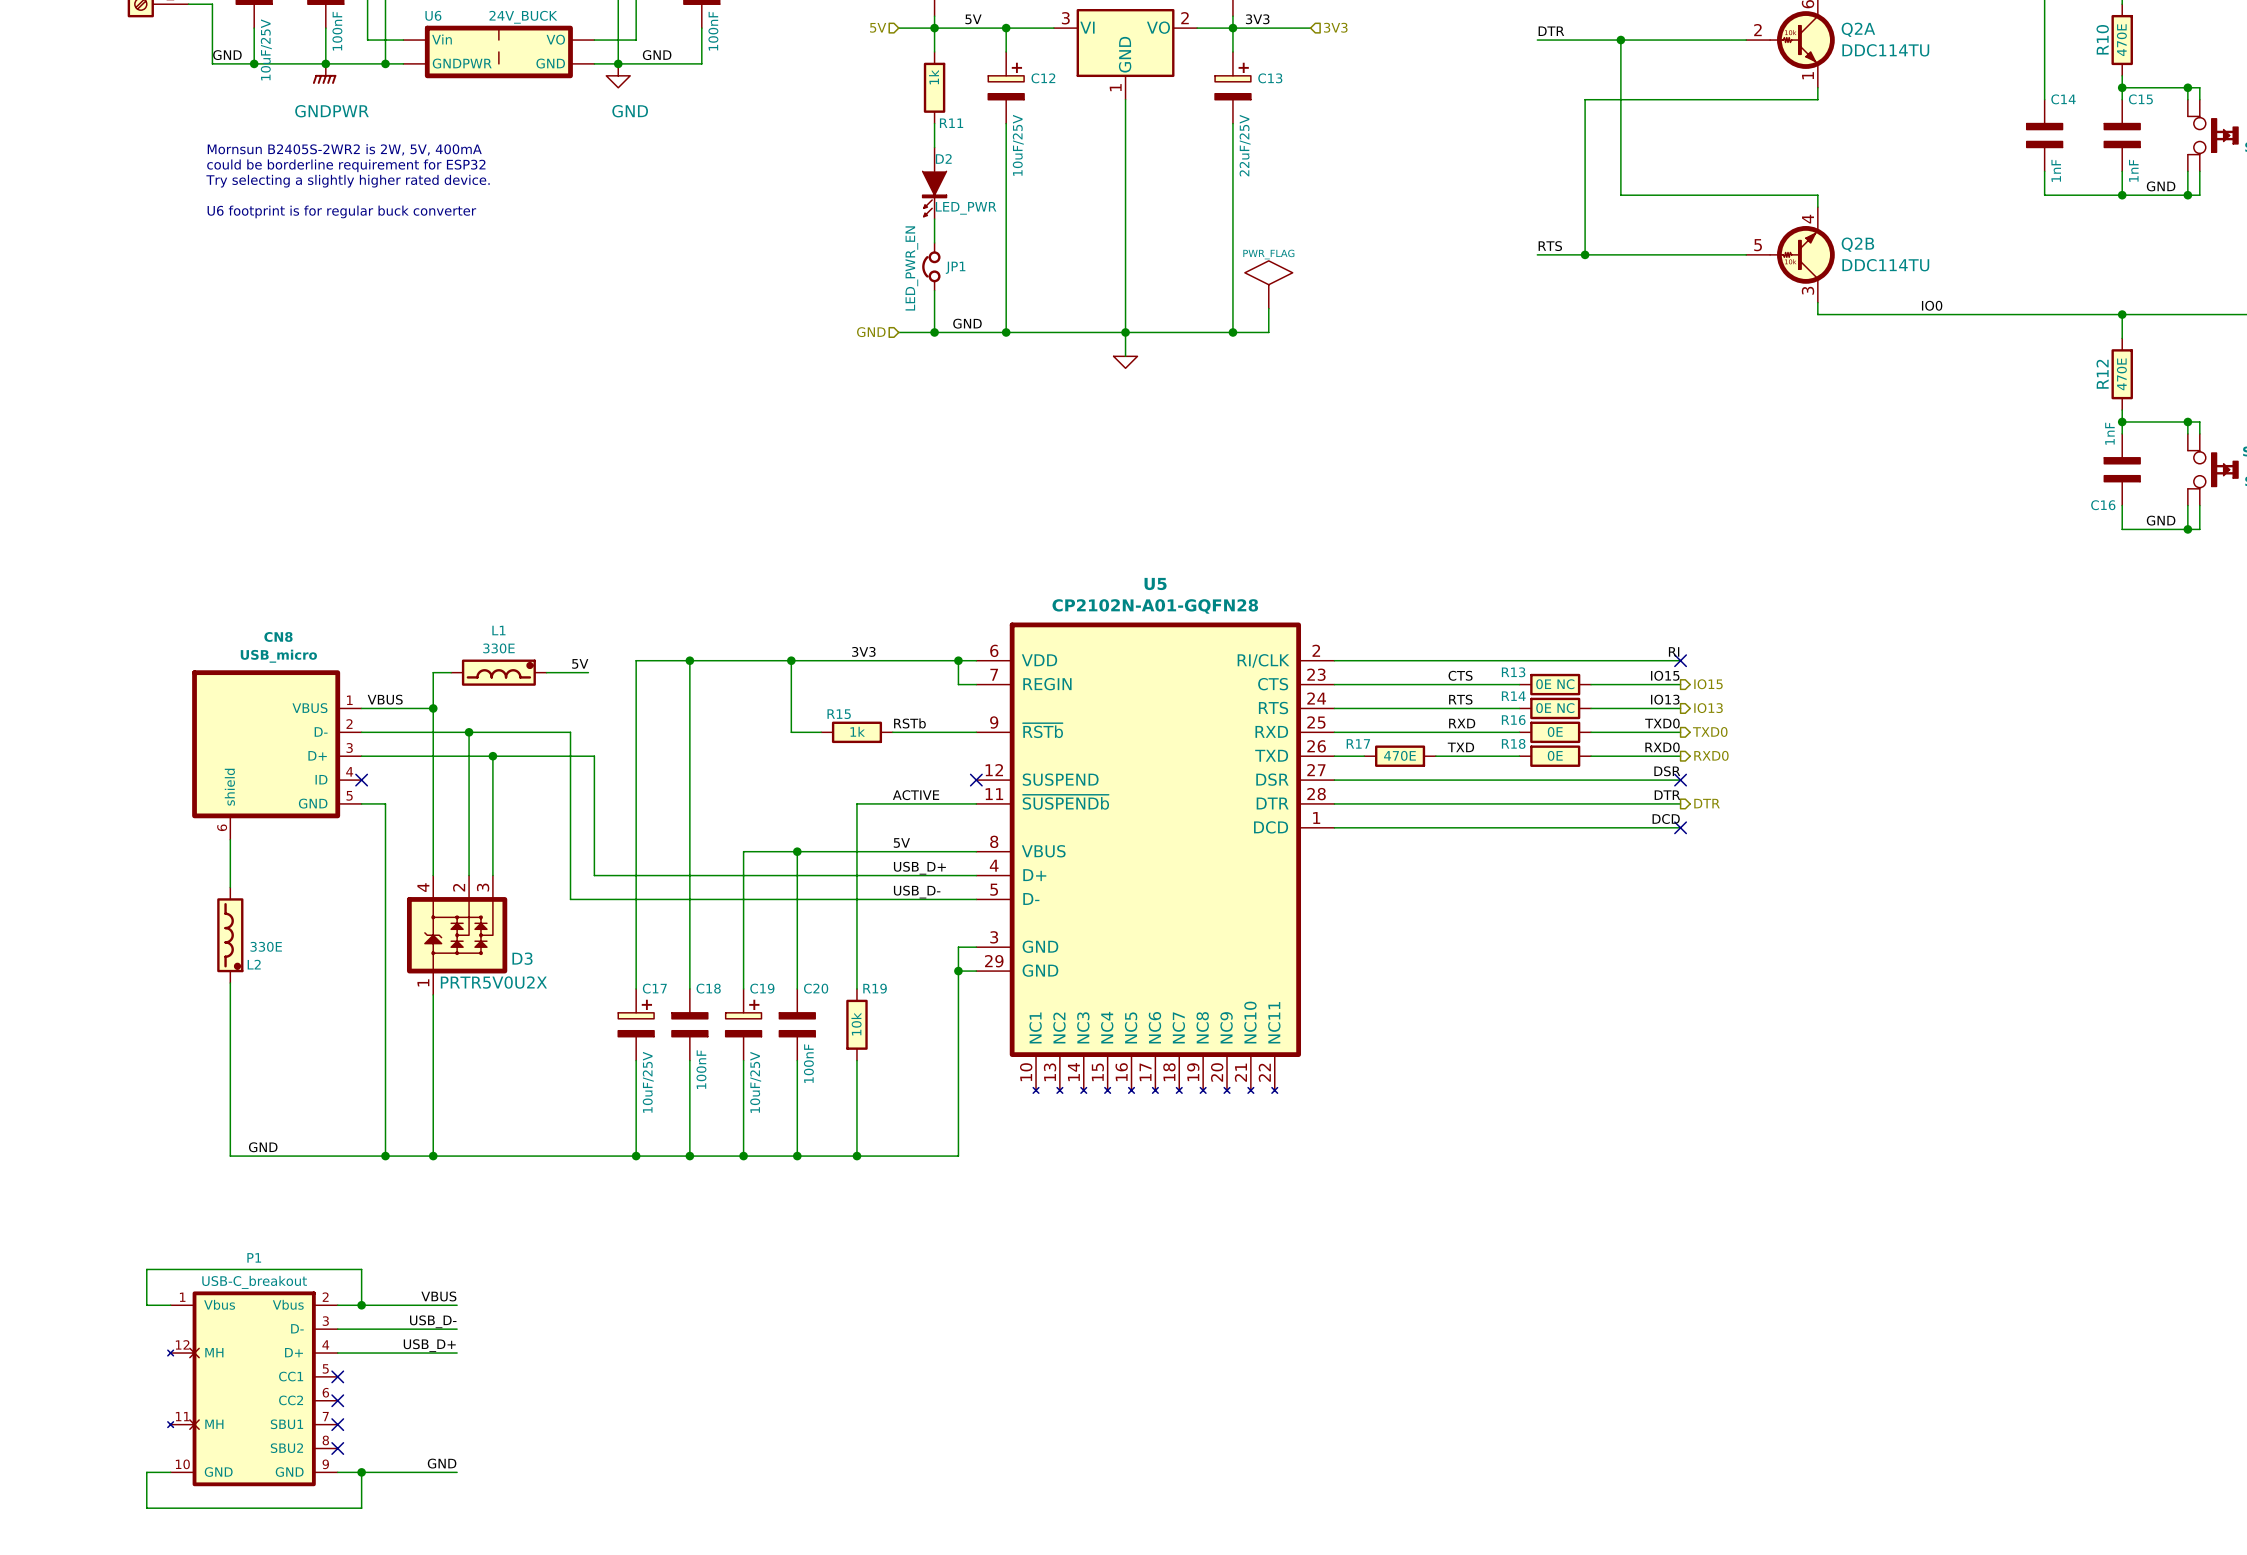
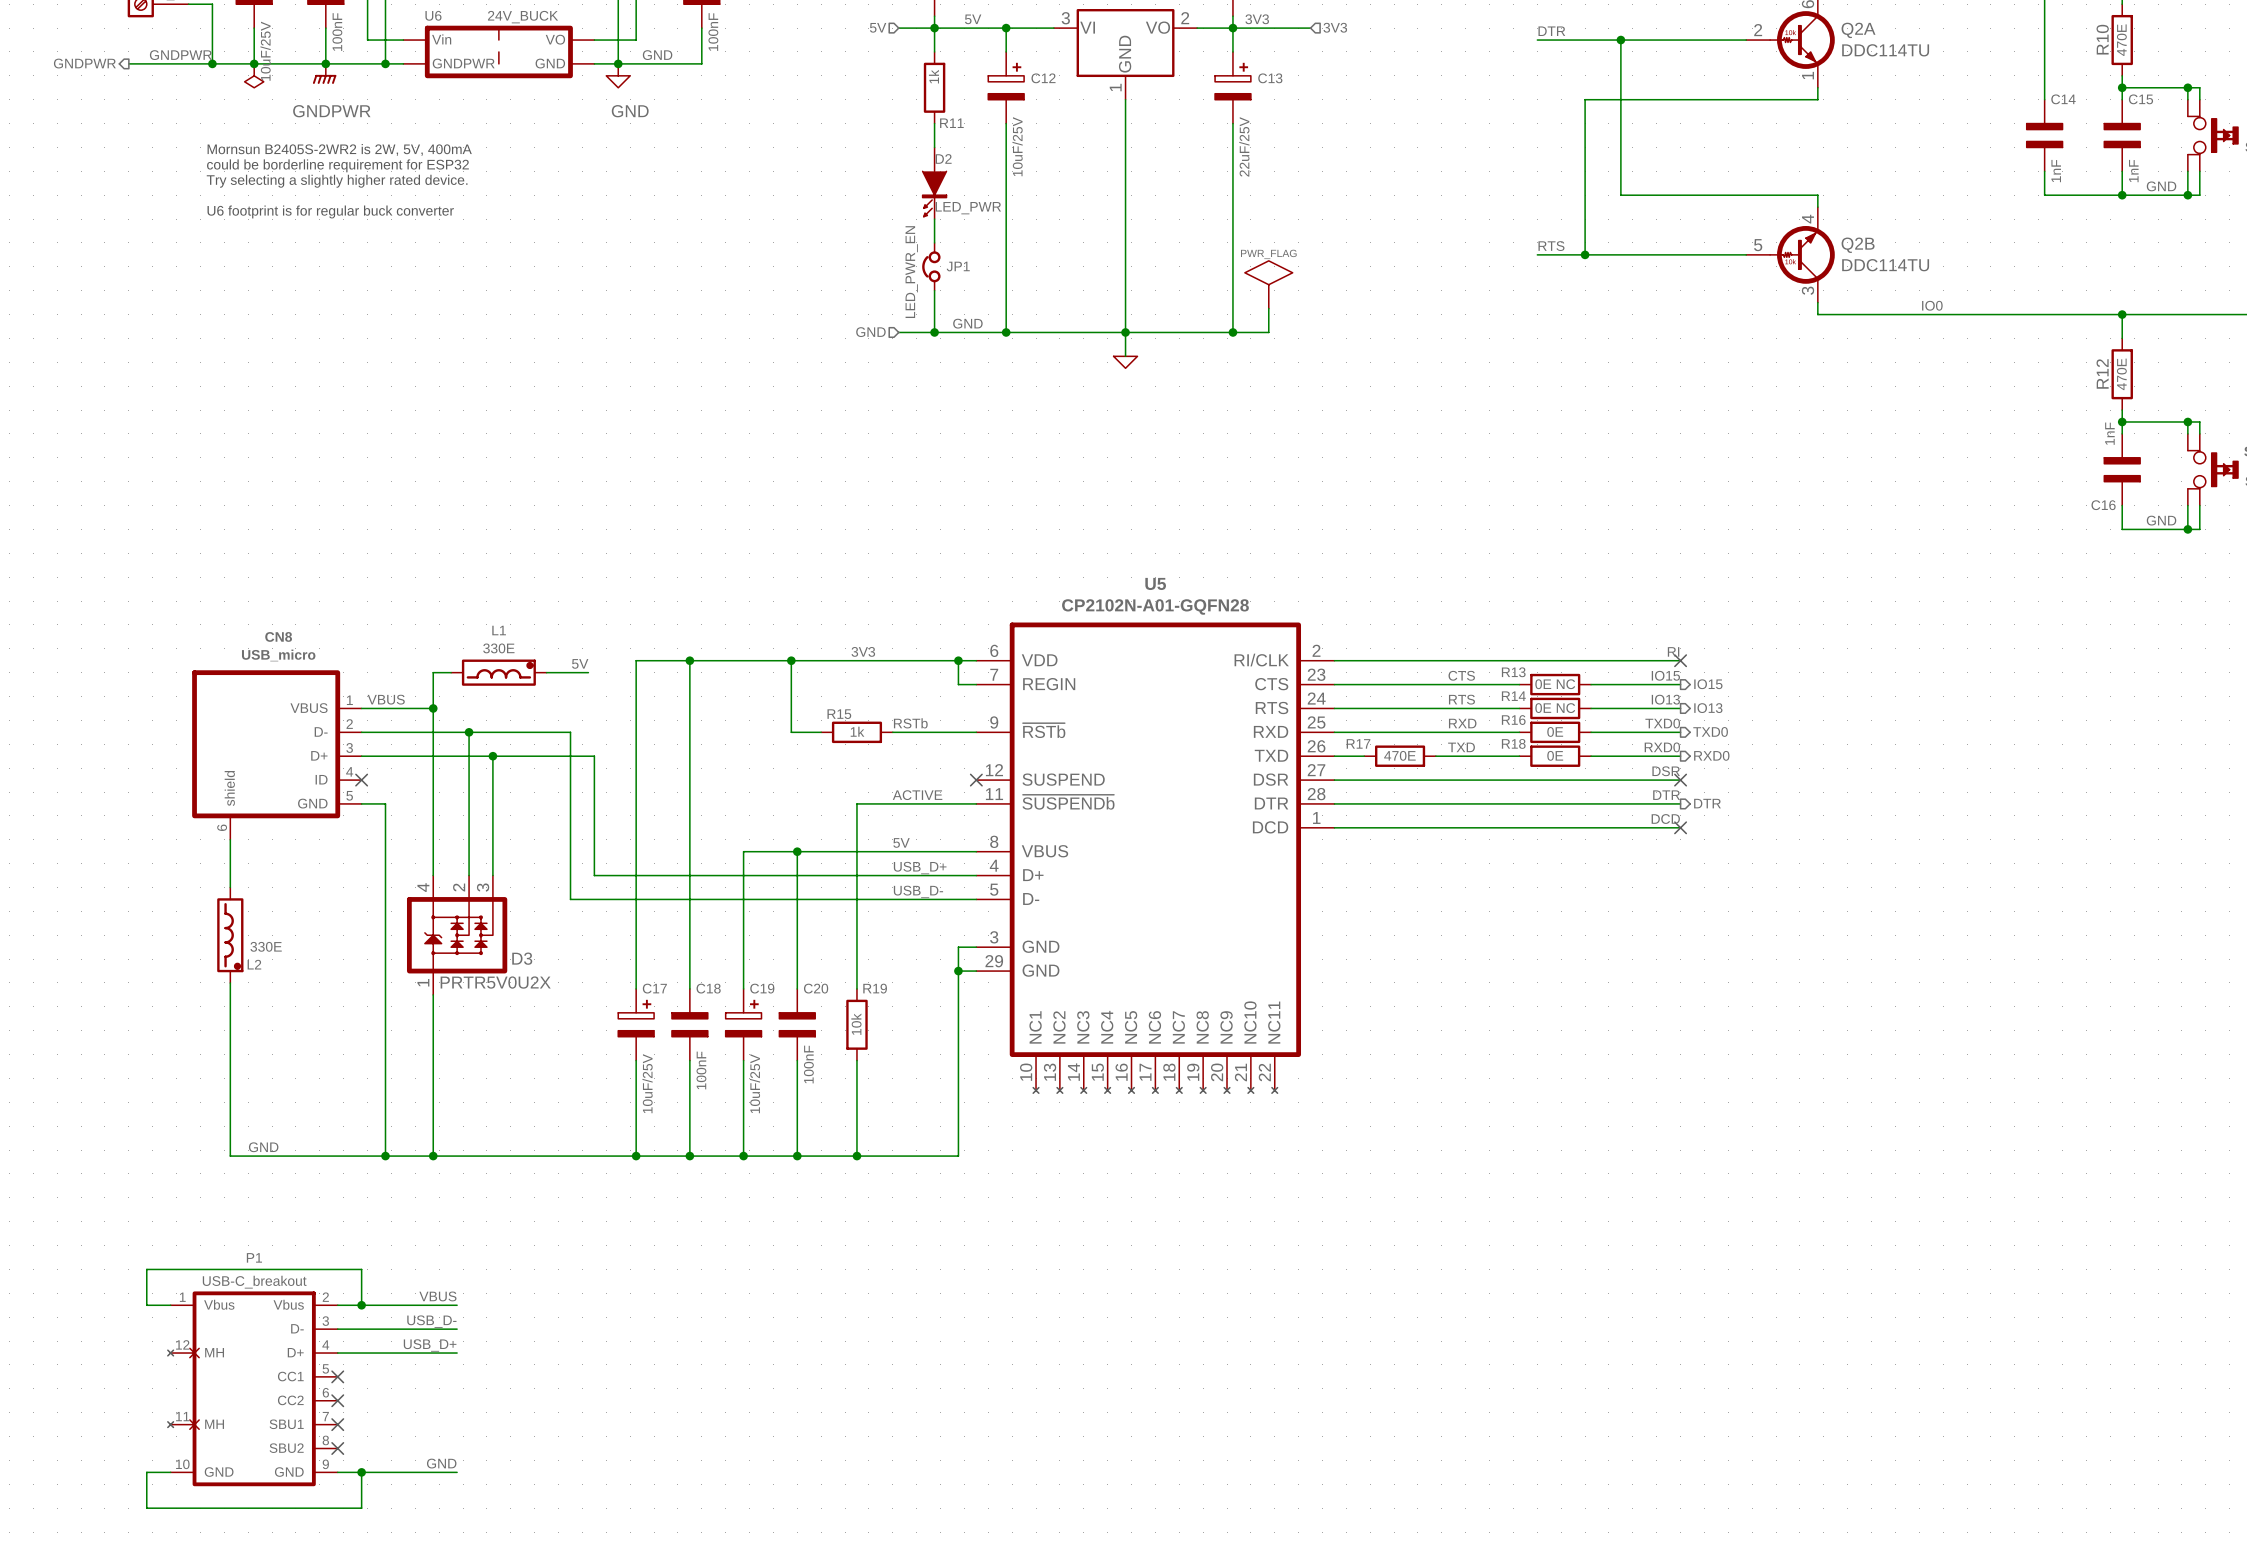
label: GND (227, 55) -> GNDPWR (180, 55)
hierarchical label: none -> GNDPWR (84, 63)
wire: none -> (128, 63) (212, 63)
junction: none -> (212, 63)
power symbol: none -> (254, 75)

